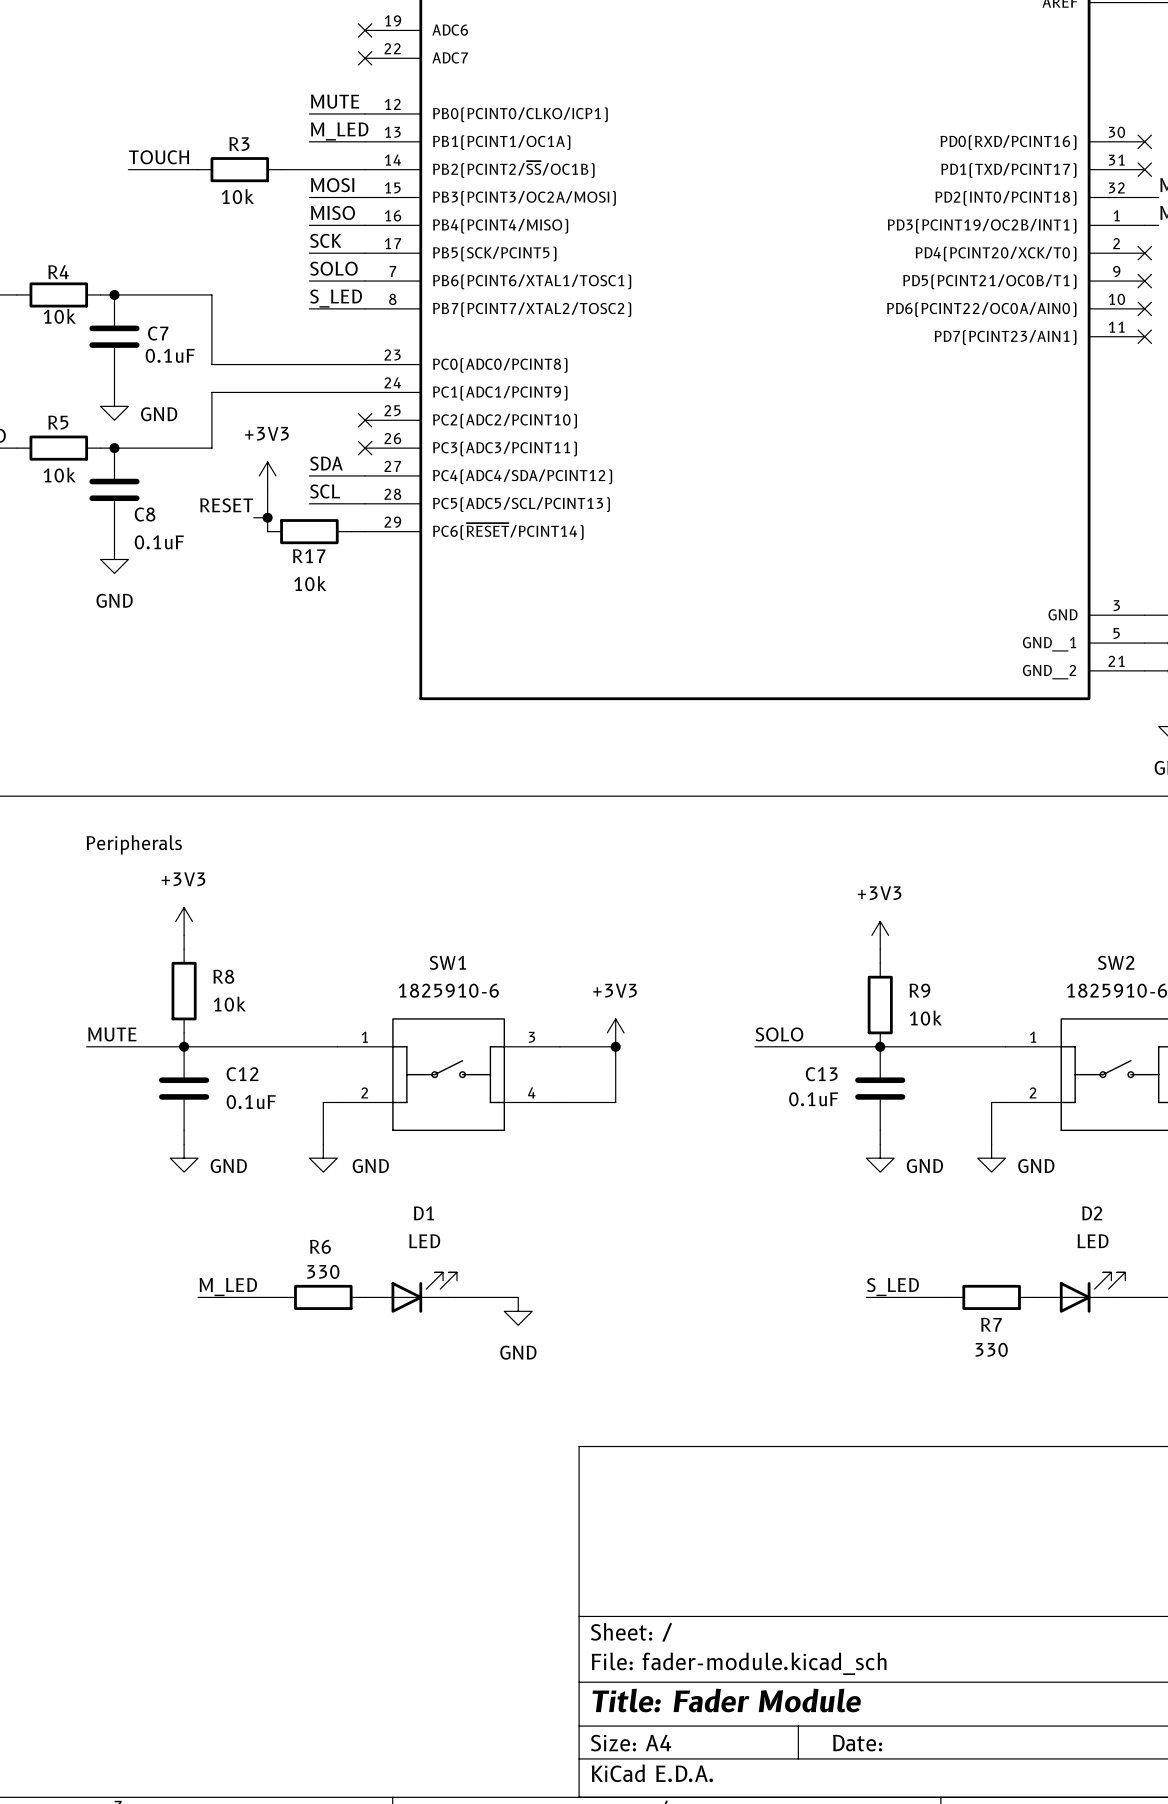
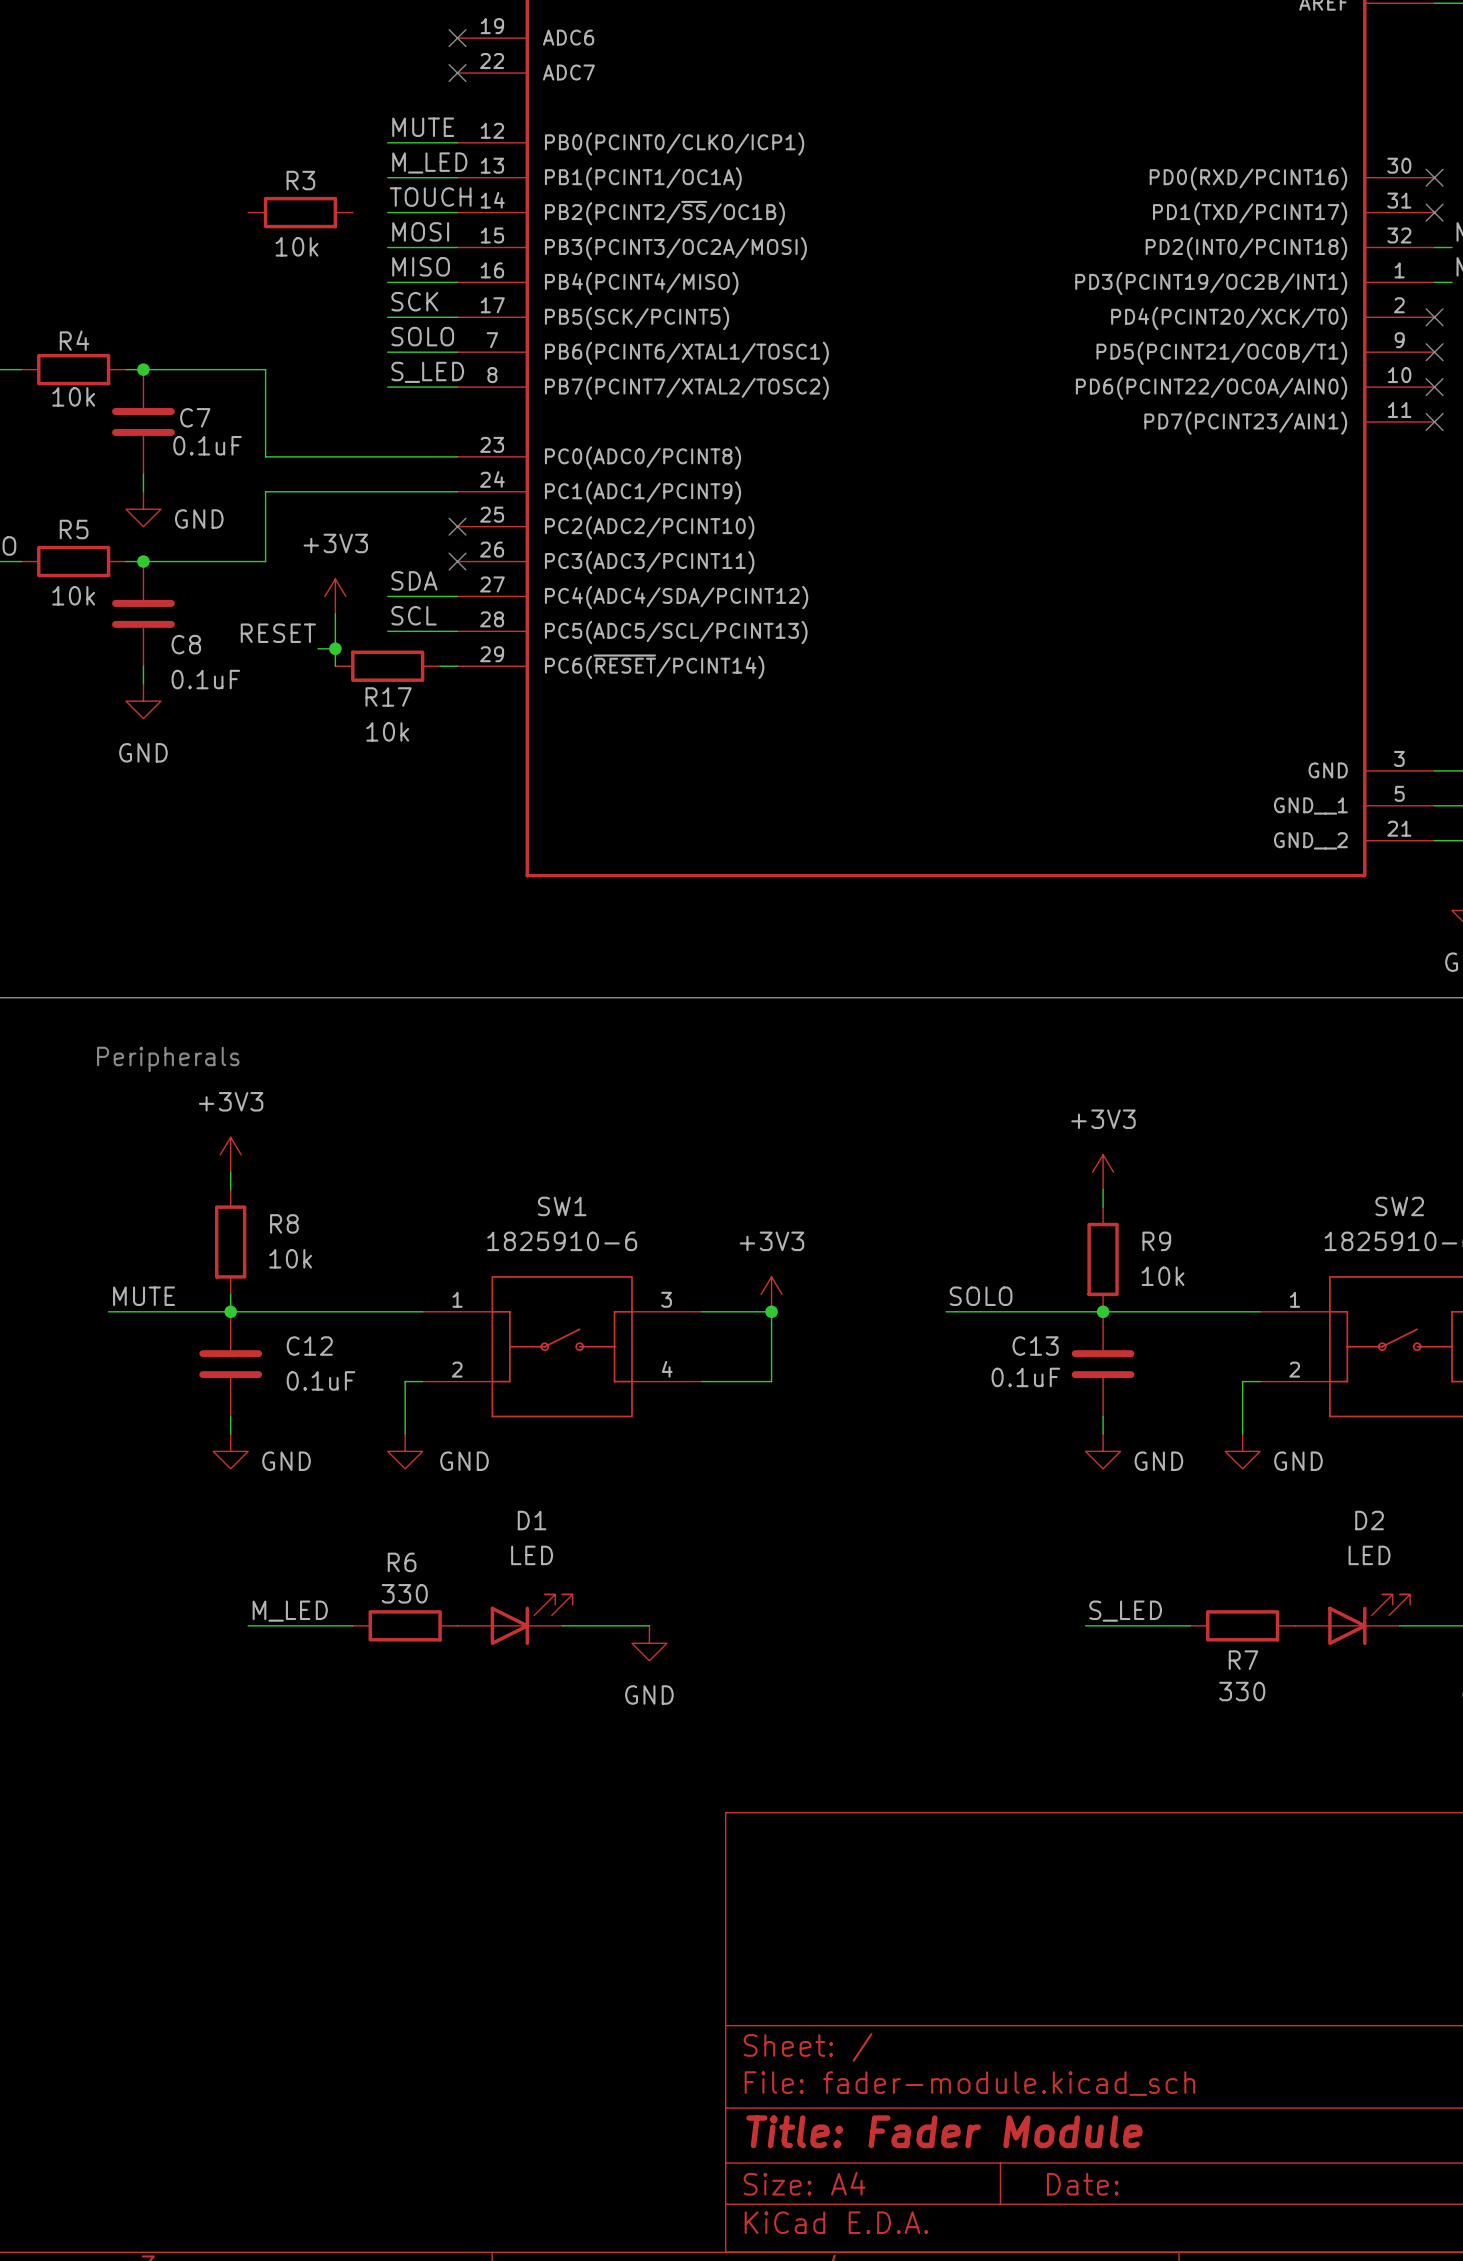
label position: TOUCH (159, 157) -> TOUCH (430, 197)
wire: (128, 169) (198, 169) -> none
wire: (281, 169) (309, 169) -> none

